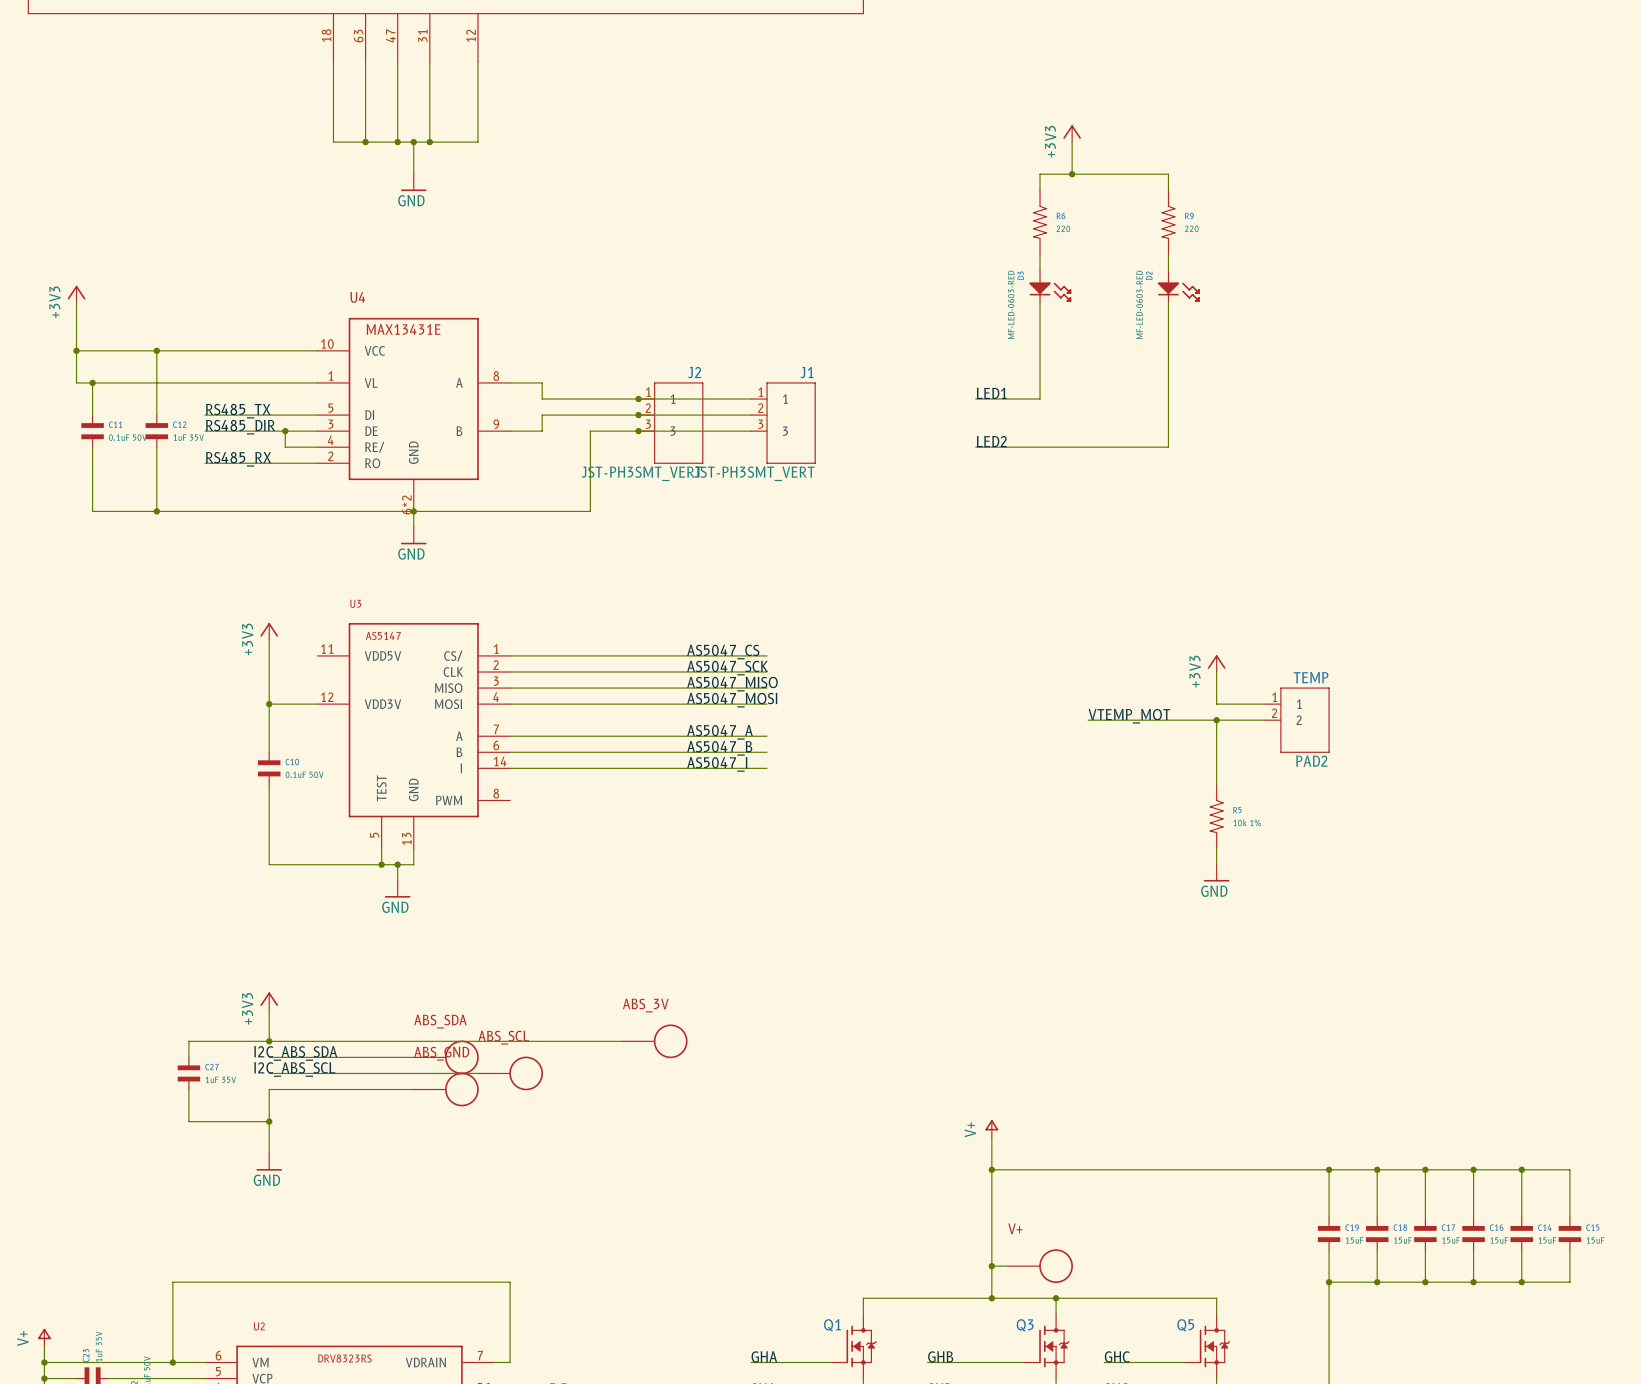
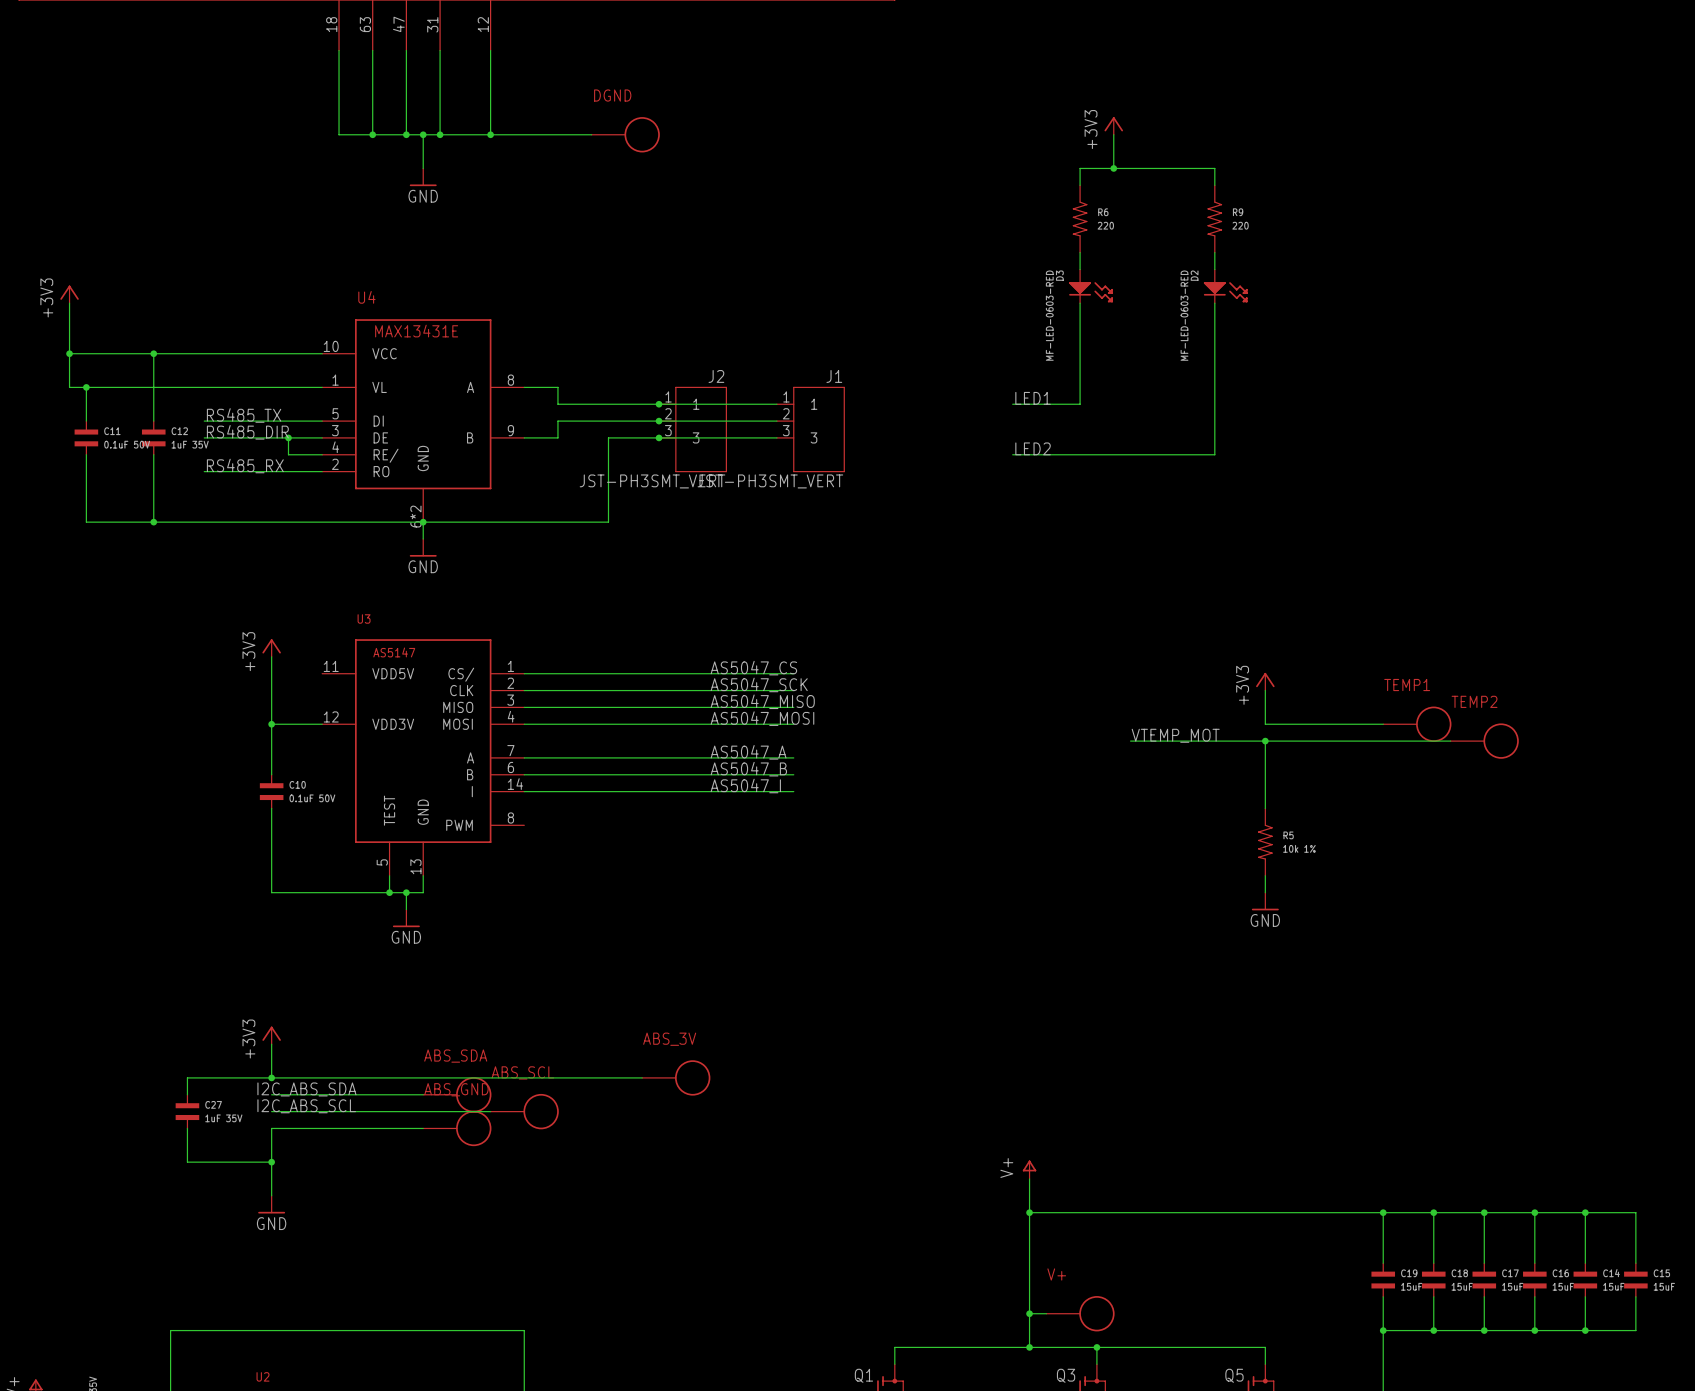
wire: none -> (490, 134) (591, 134)
junction: none -> (490, 134)
DGND: none -> (625, 134)
wire: none -> (1315, 724) (1383, 724)
TEMP1: none -> (1417, 724)
wire: none -> (1315, 741) (1450, 741)
TEMP: PAD2 (1297, 720) -> none
TEMP2: none -> (1484, 741)

